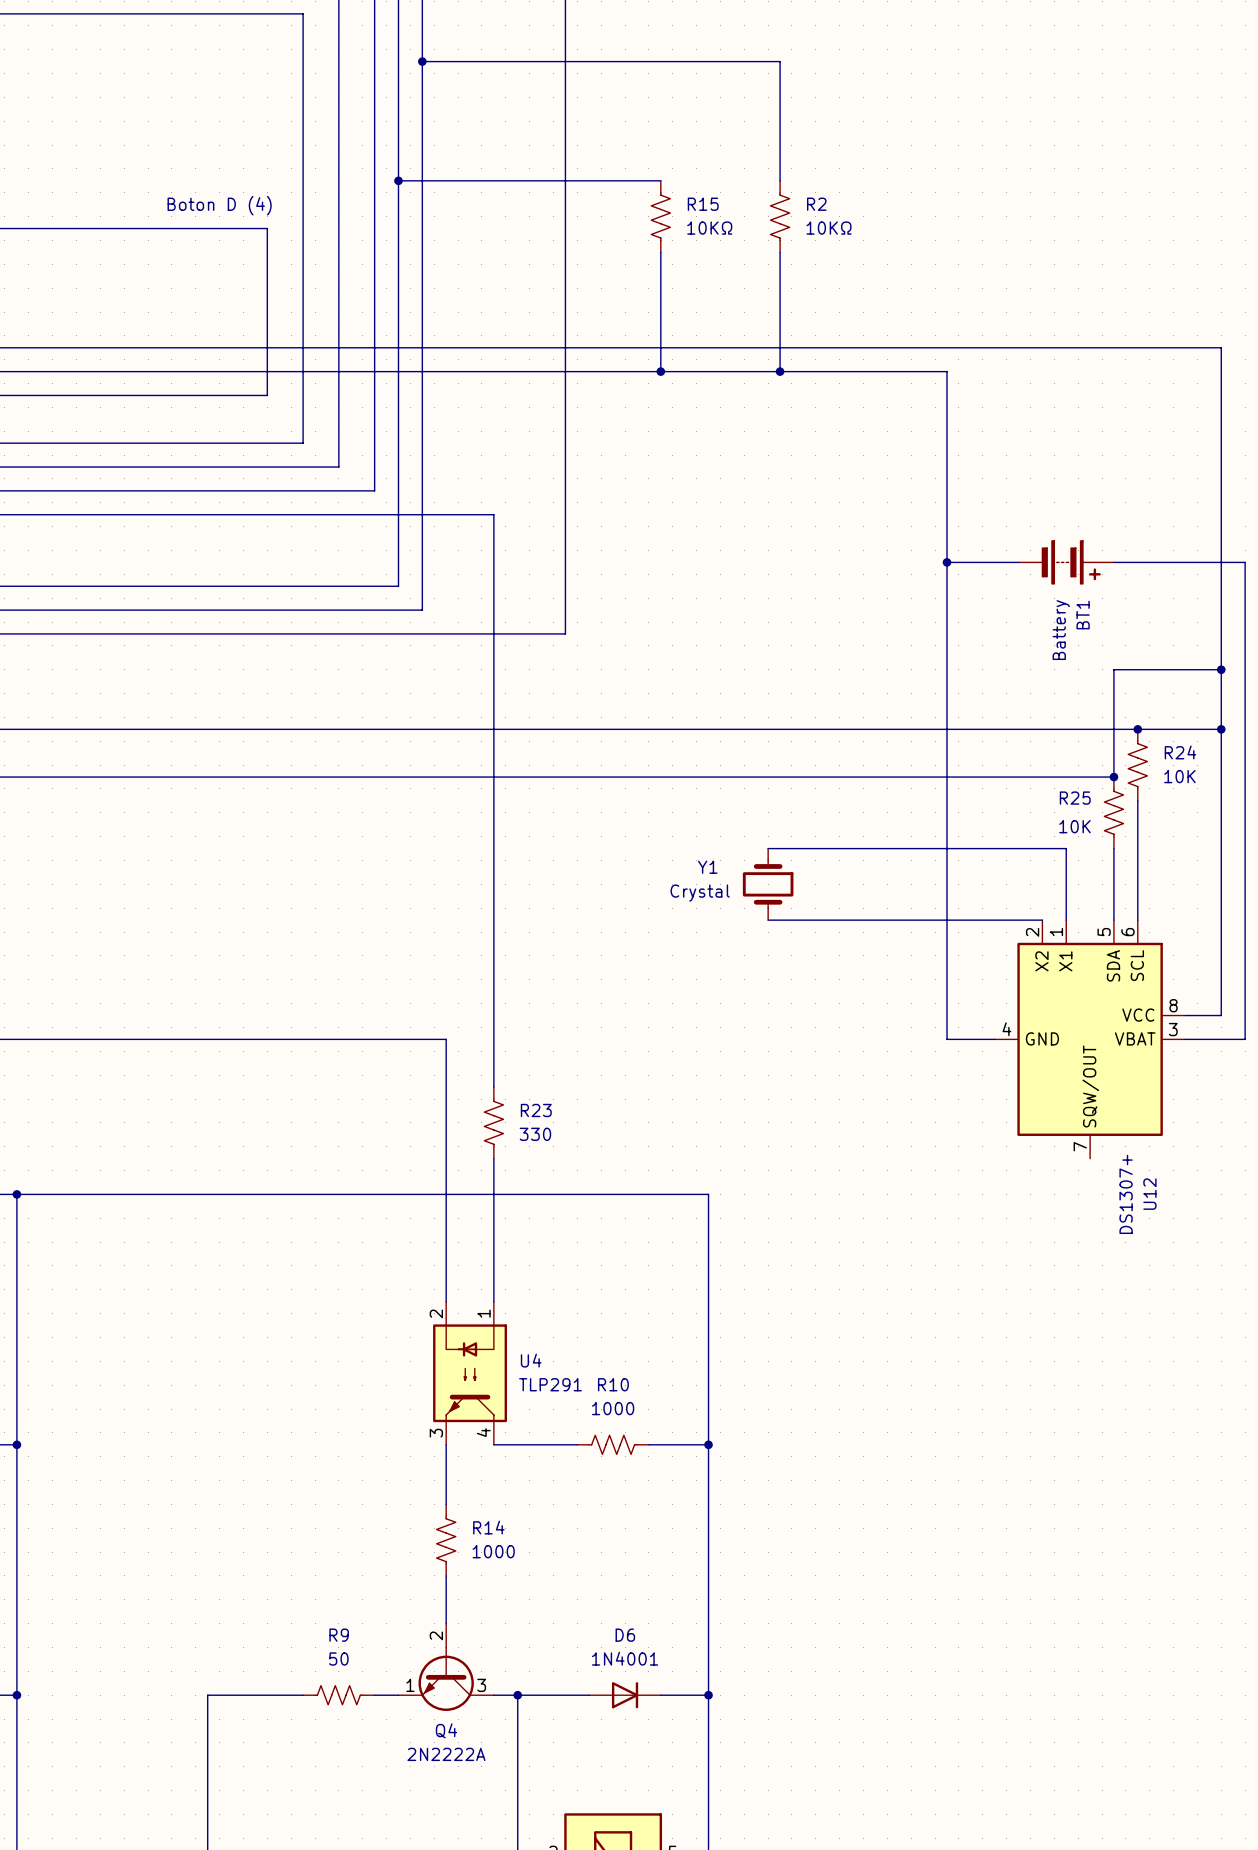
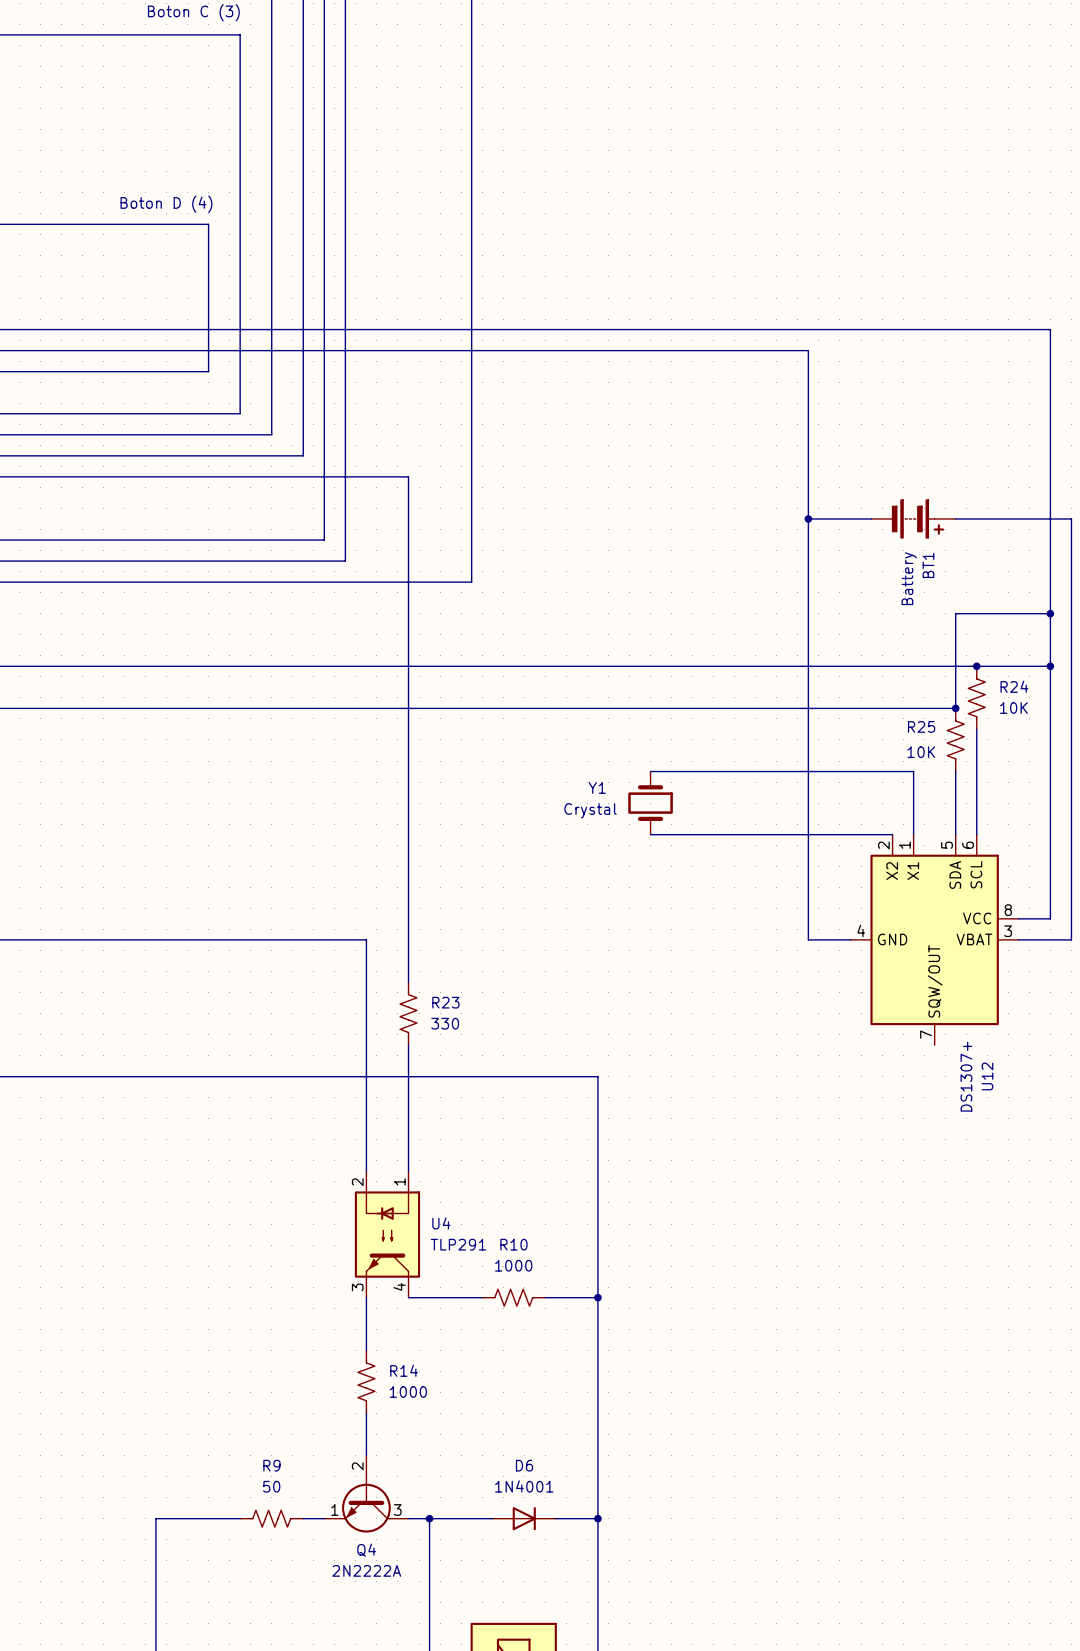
wire: (422, 61) (780, 61) (780, 180) -> none
junction: (422, 61) -> none
wire: (398, 180) (660, 180) -> none
junction: (398, 180) -> none
R15: 10KΩ (660, 216) -> none
R2: 10KΩ (780, 216) -> none
wire: (660, 252) (660, 371) -> none
wire: (780, 252) (780, 371) -> none
junction: (660, 371) -> none
junction: (780, 371) -> none

